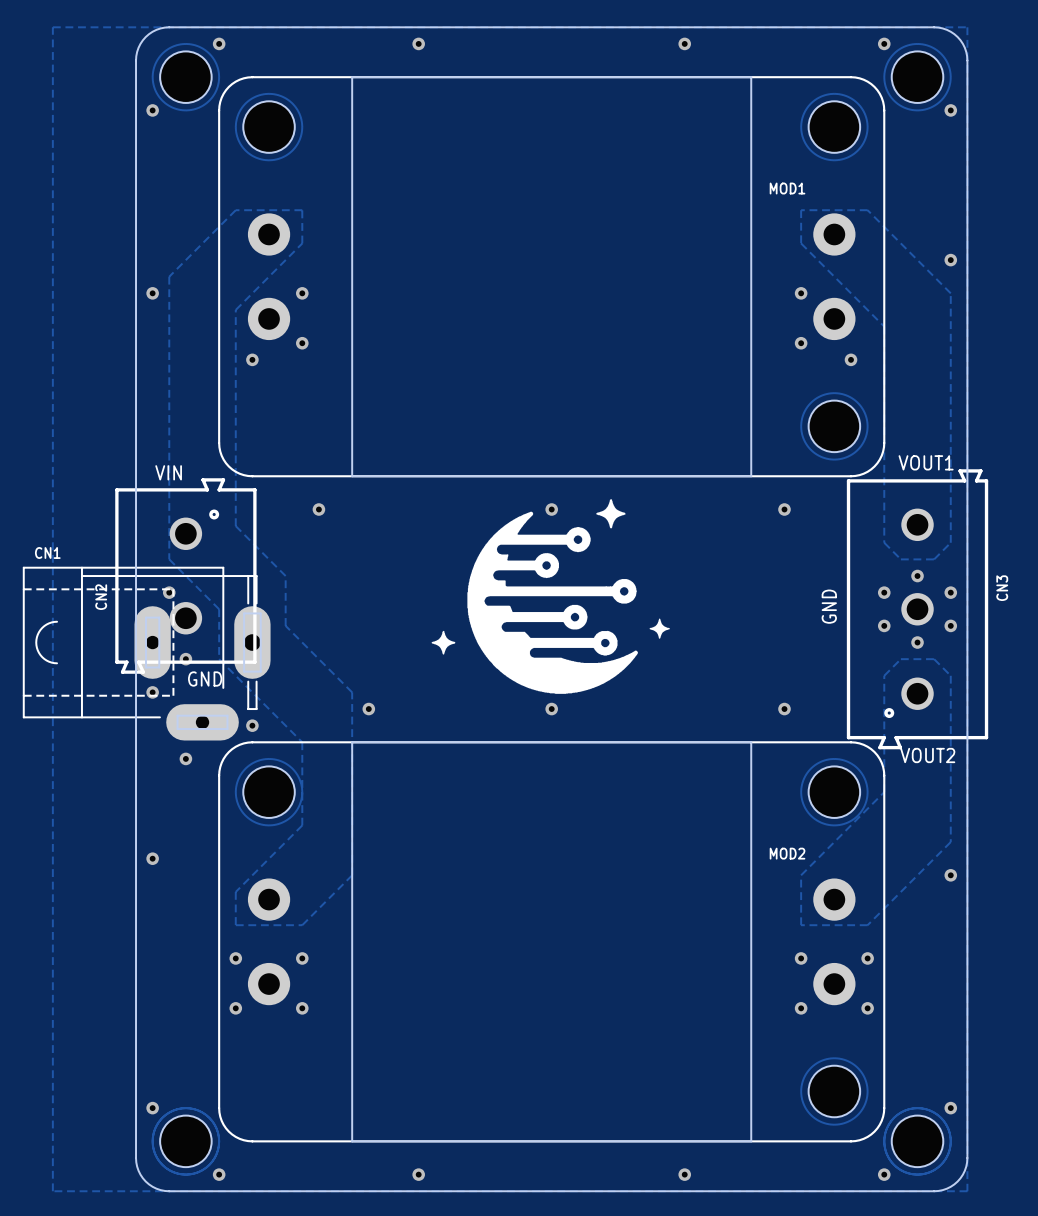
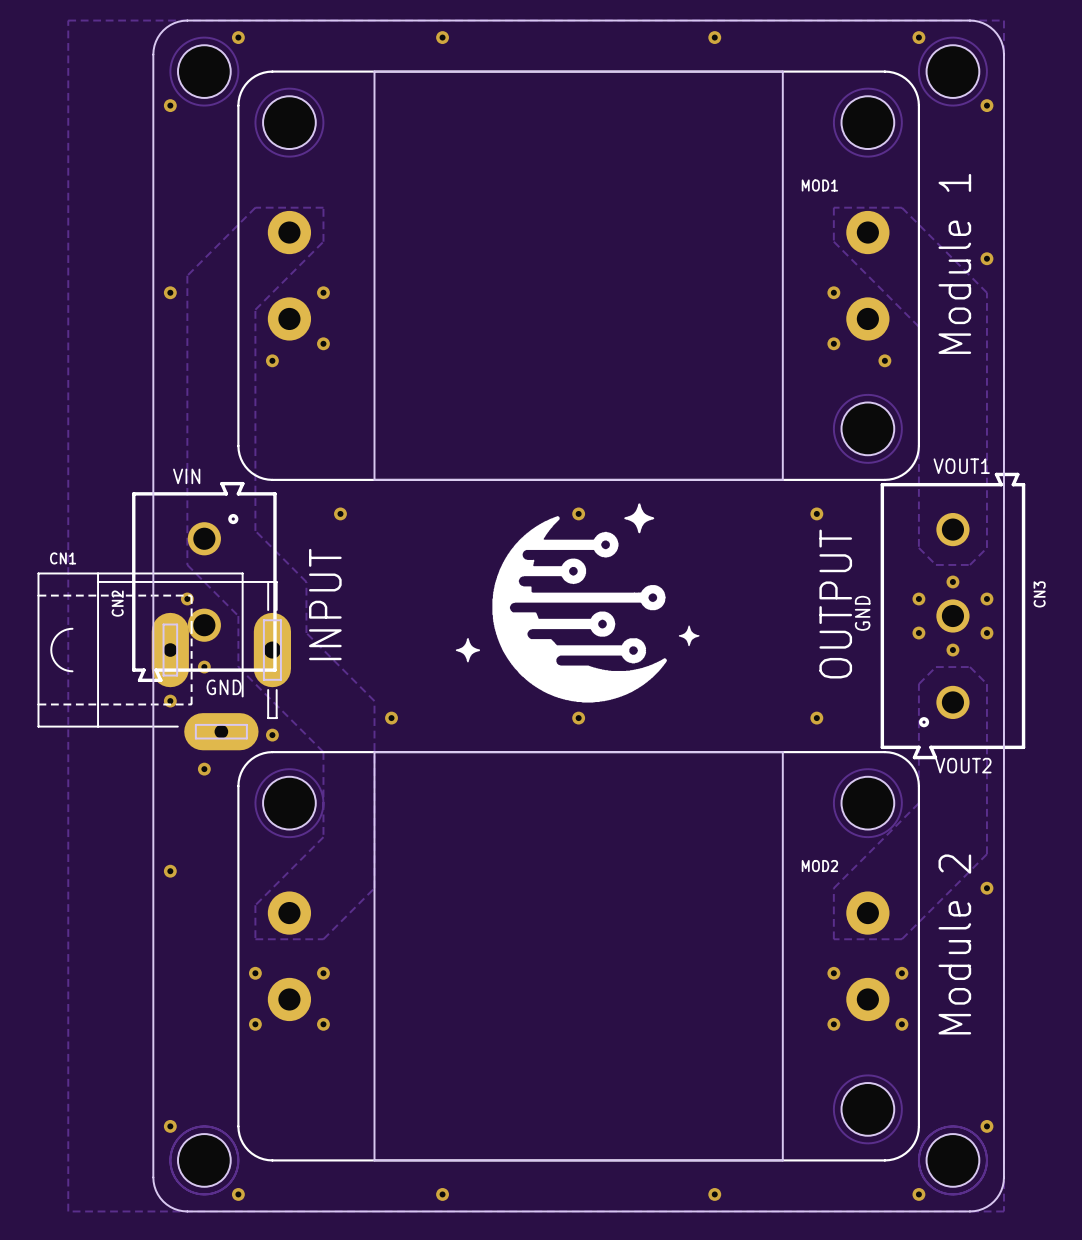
text: none -> Module 1 (954, 263)
text: none -> OUTPUT (835, 604)
text: none -> INPUT (325, 604)
text: none -> Module 2 (954, 944)

